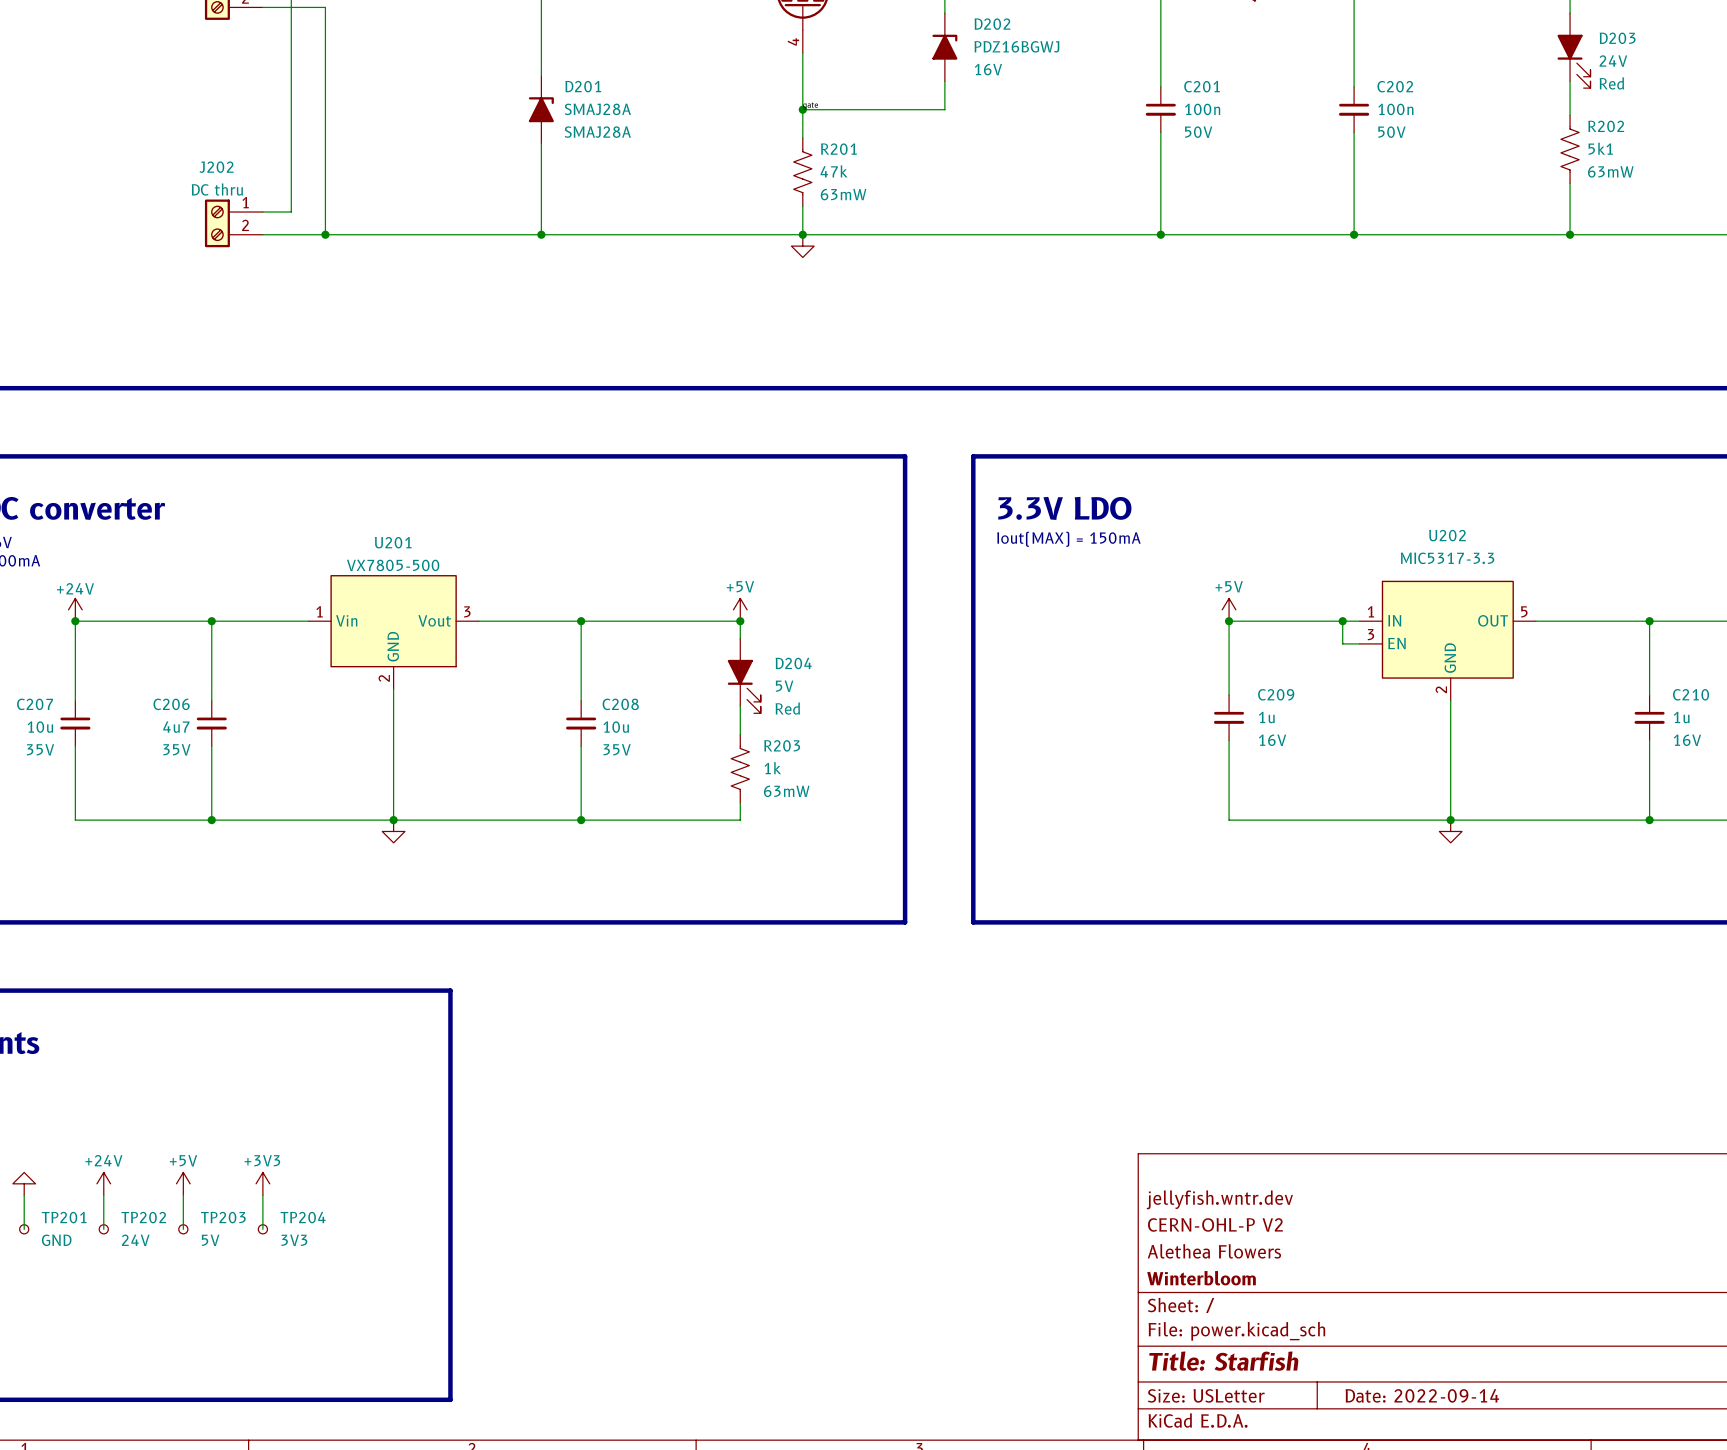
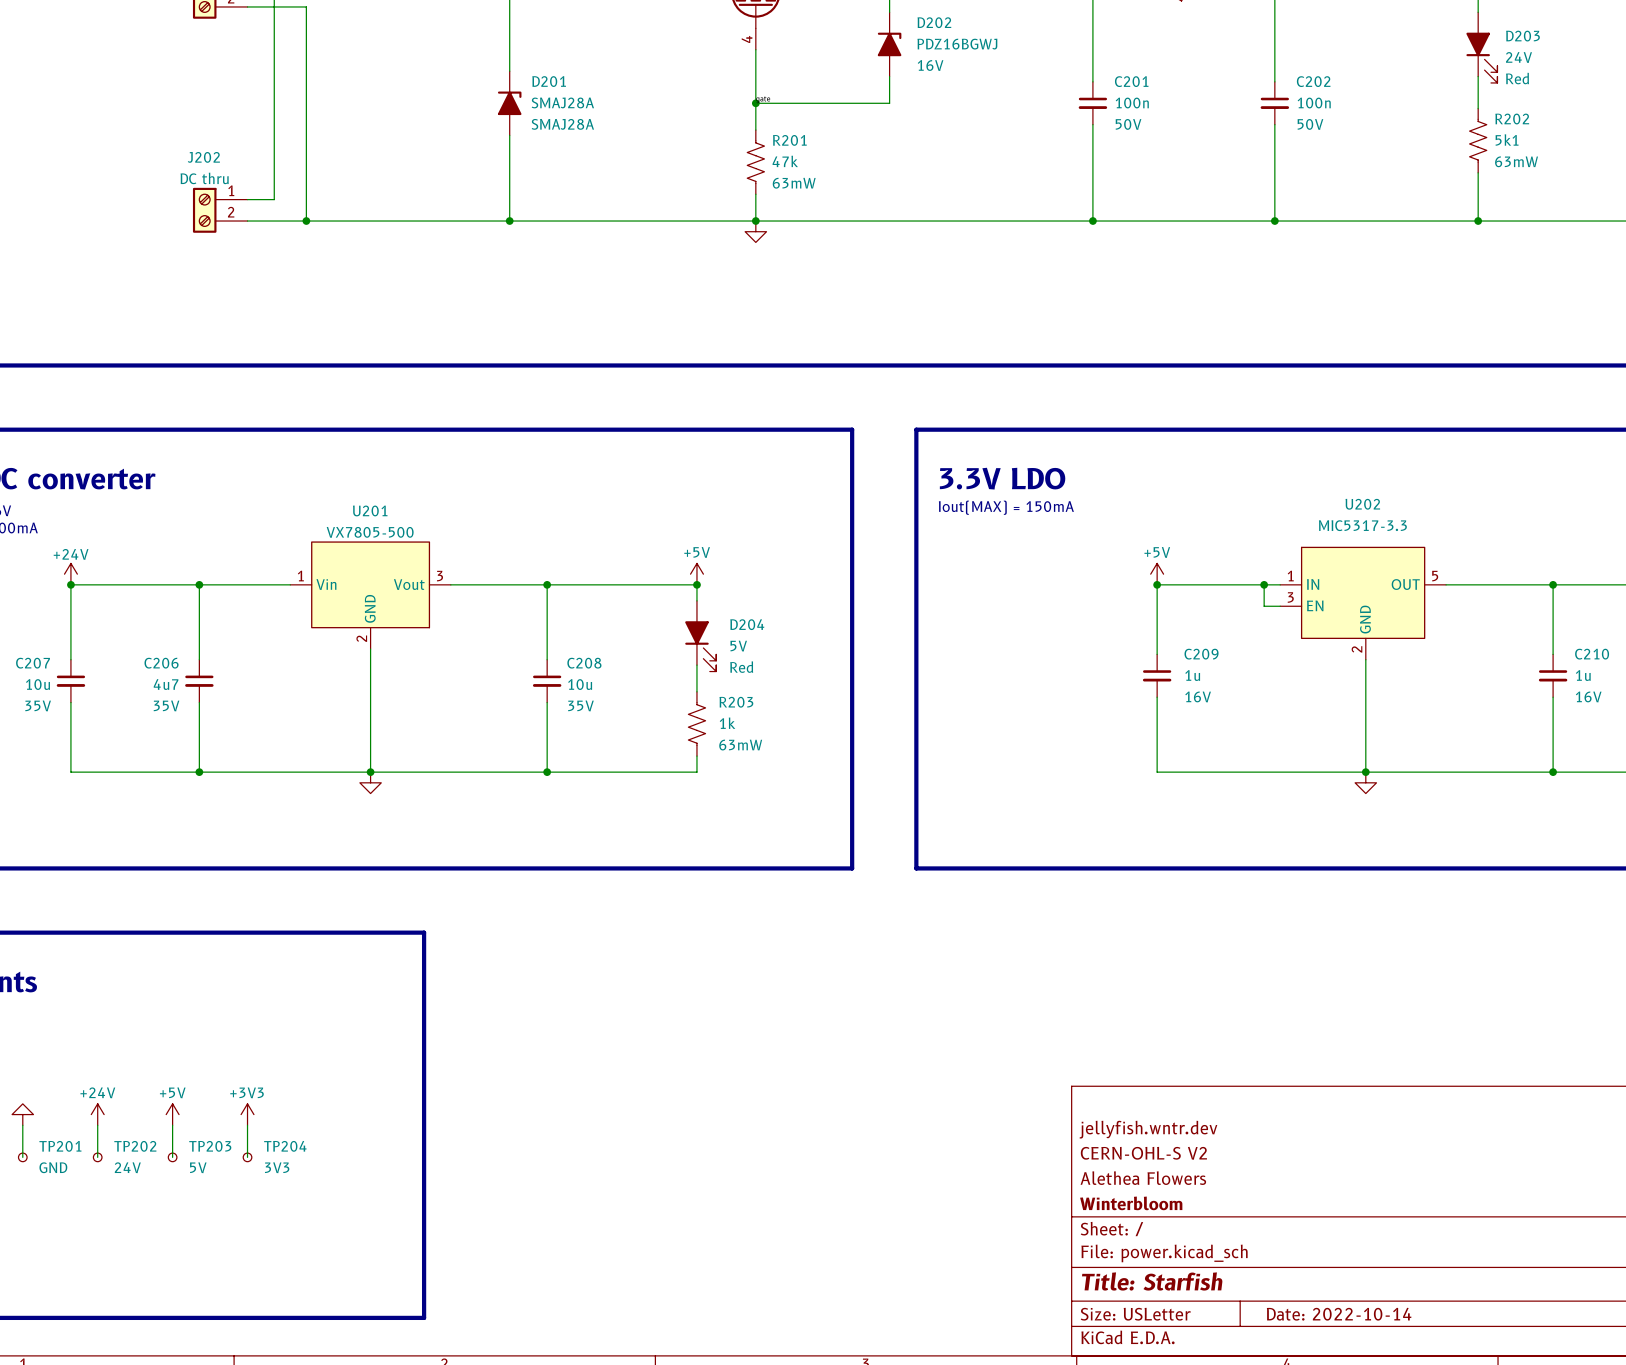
title block: CERN-OHL-P V2 (1215, 1224) -> CERN-OHL-S V2 (1143, 1153)
title block: Date: 2022-09-14 (1422, 1395) -> Date: 2022-10-14 (1339, 1314)

